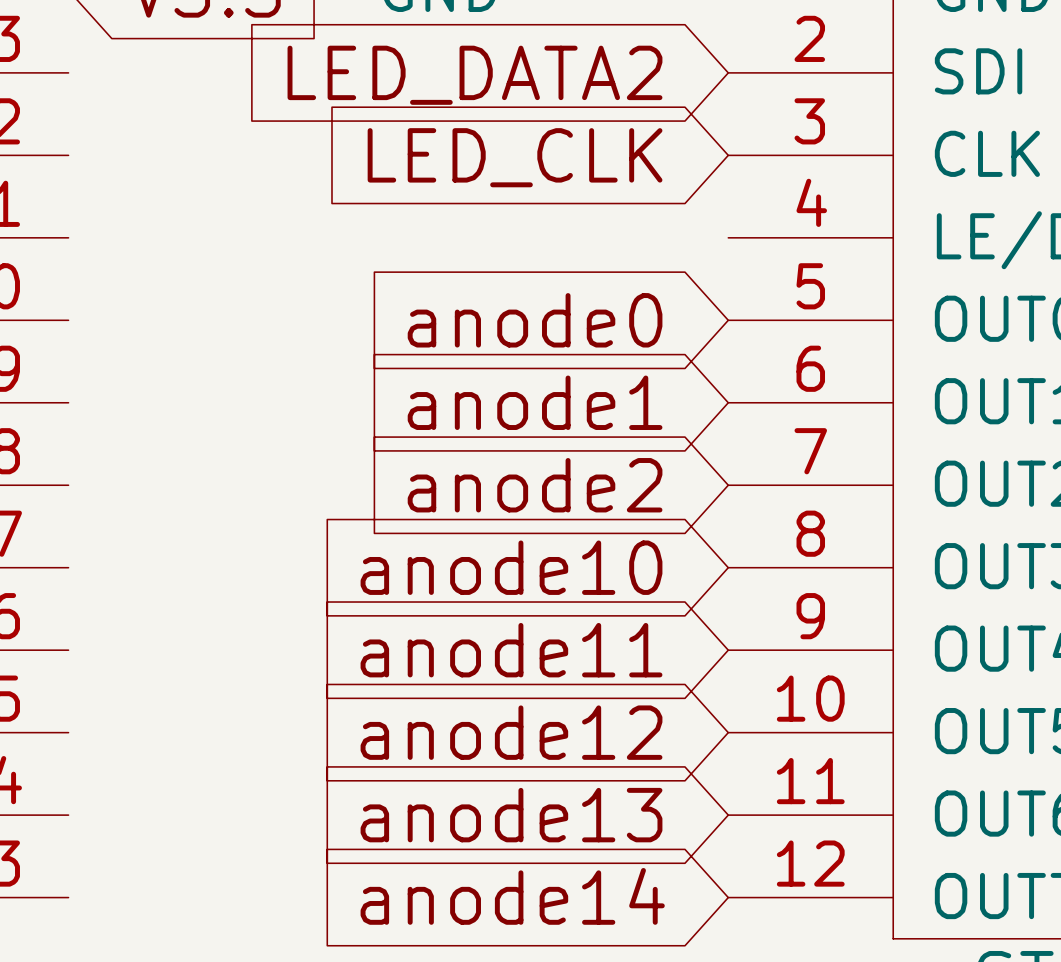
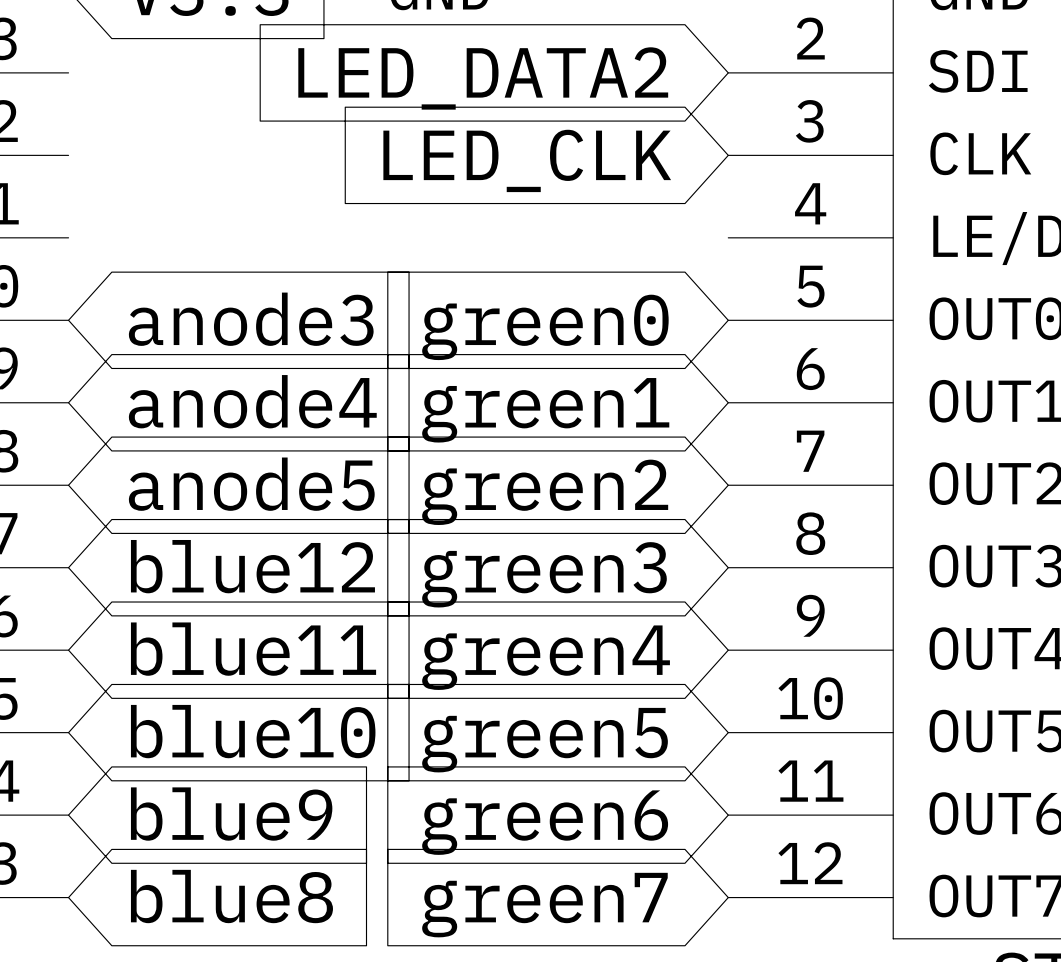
global label: none -> anode3 (251, 319)
global label: anode0 (535, 320) -> green0 (545, 327)
global label: none -> anode4 (252, 401)
global label: anode1 (535, 402) -> green1 (545, 410)
global label: none -> anode5 (251, 484)
global label: anode2 (535, 485) -> green2 (545, 492)
global label: none -> blue12 (252, 566)
global label: anode10 (511, 567) -> green3 (544, 574)
global label: none -> blue11 (253, 649)
global label: anode11 (511, 650) -> green4 (546, 657)
global label: none -> blue10 (253, 731)
global label: anode12 (511, 732) -> green5 (545, 740)
global label: none -> blue9 (231, 814)
global label: anode13 (511, 815) -> green6 (545, 822)
global label: anode14 (512, 896) -> green7 (544, 905)
global label: none -> blue8 (231, 896)

